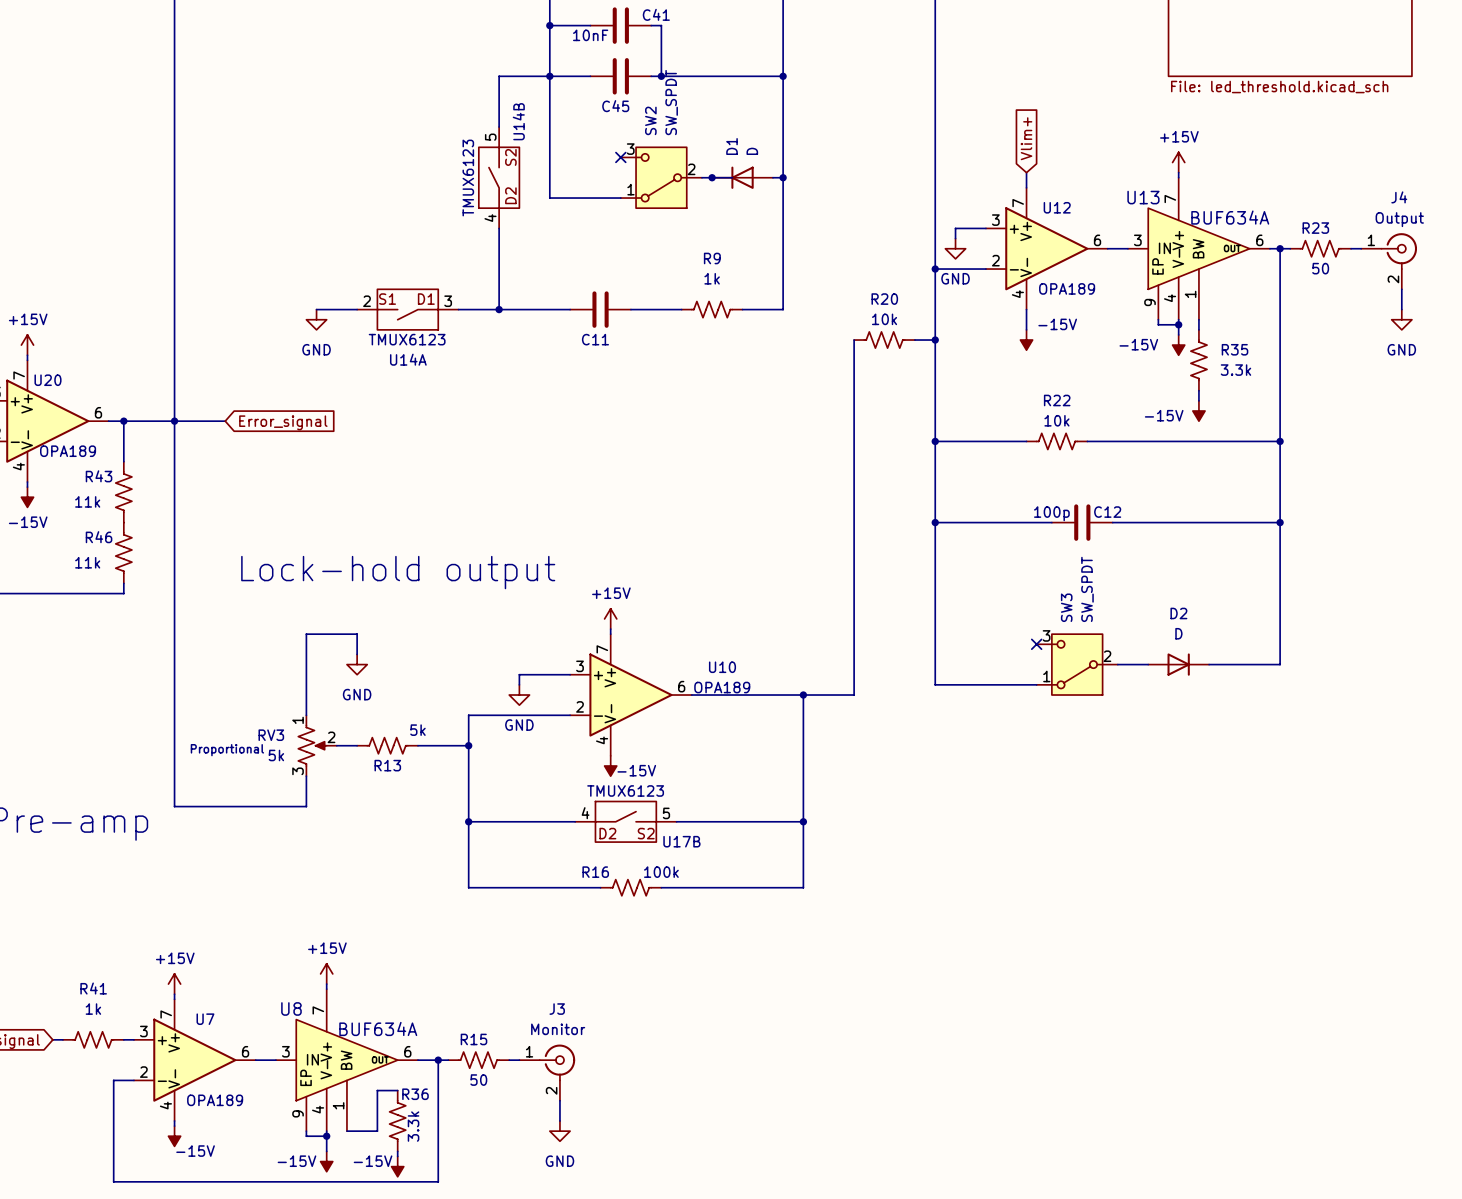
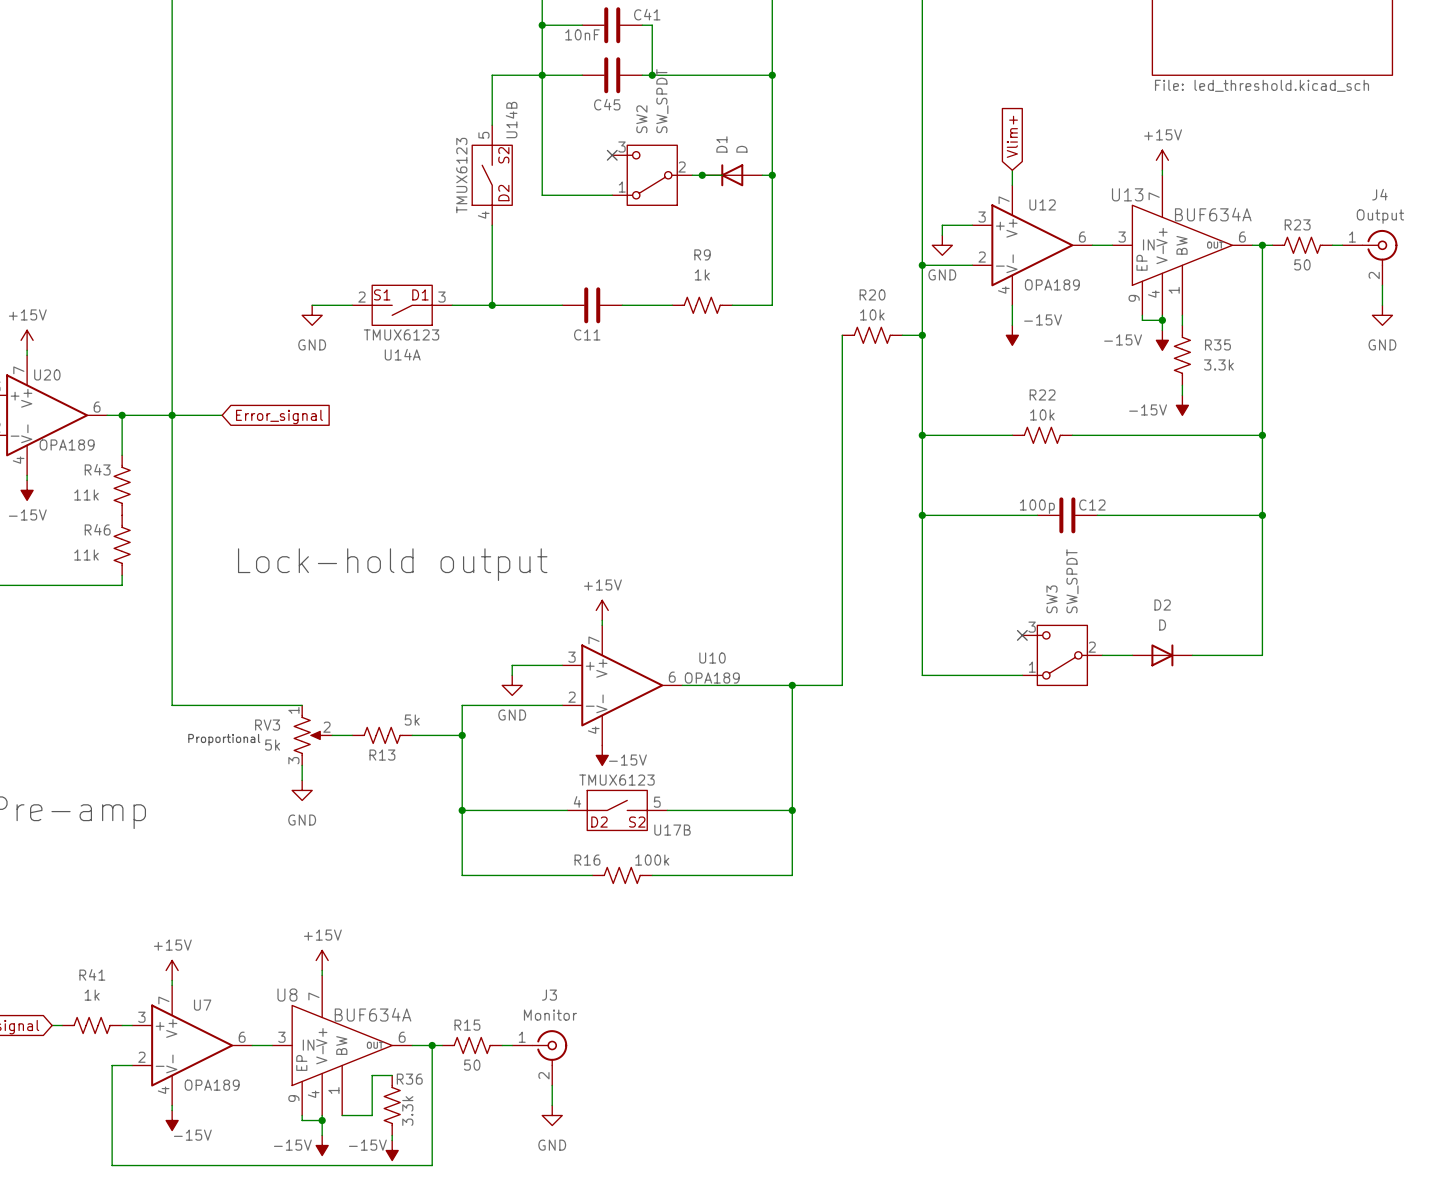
wire: (357, 654) (357, 634) (306, 634) (306, 715) -> none
power symbol position: GND (357, 664) -> GND (302, 790)
wire: (174, 715) (174, 806) (306, 806) (306, 791) -> (172, 705) (302, 705)

